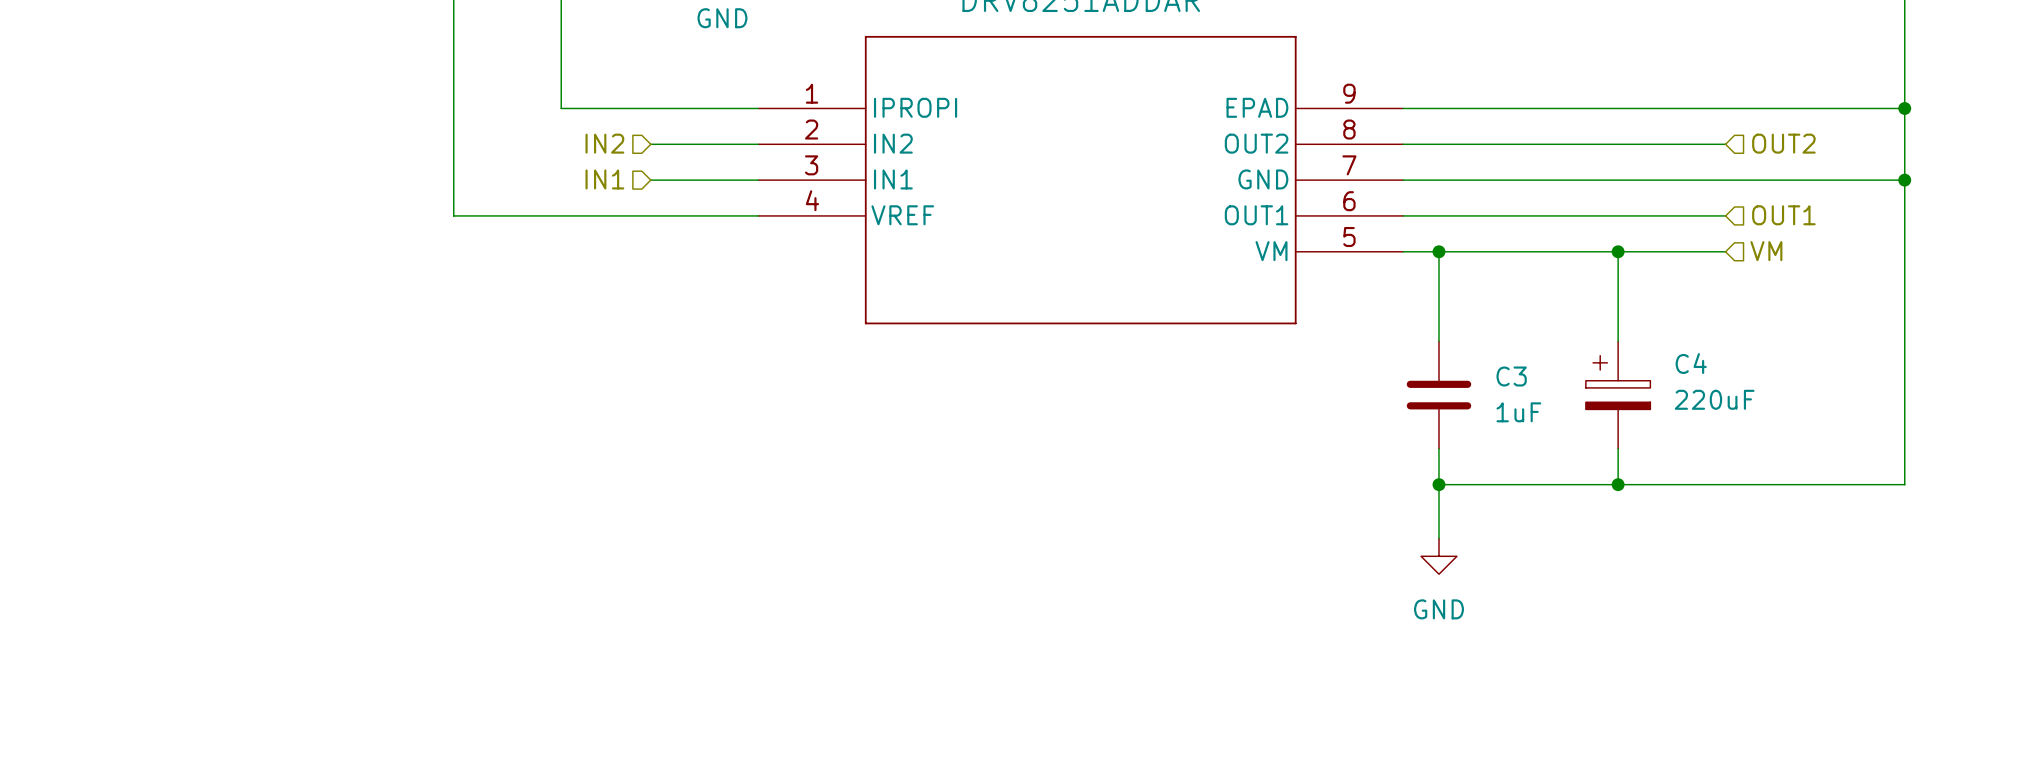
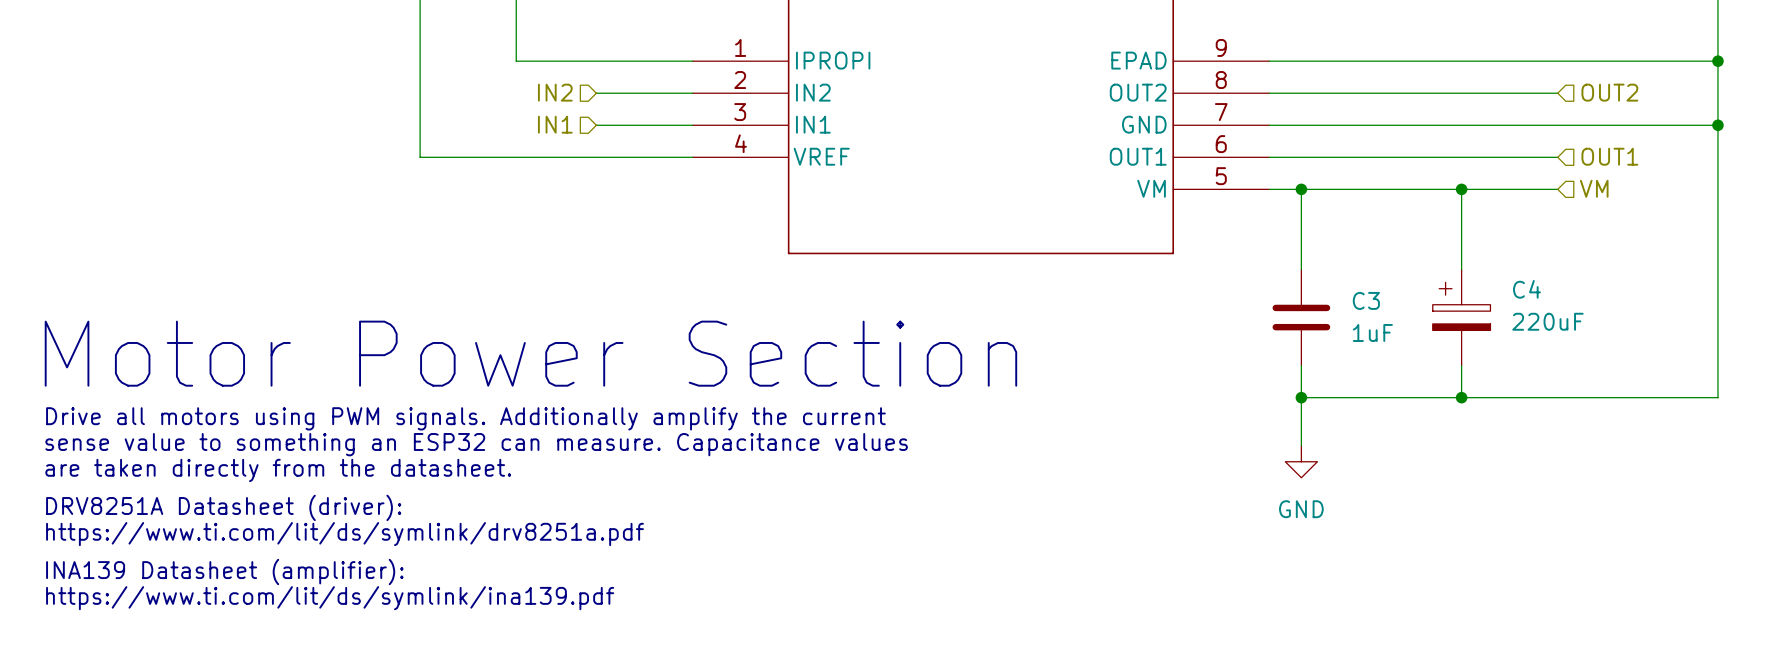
text: none -> Motor Power Section (530, 353)
text: none -> Drive all motors using PWM signals. Additionally amplify the current (465, 418)
text: none -> sense value to something an ESP32 can measure. Capacitance values (476, 444)
text: none -> are taken directly from the datasheet. (278, 470)
text: none -> DRV8251A Datasheet (driver): (223, 507)
text: none -> https://www.ti.com/lit/ds/symlink/drv8251a.pdf (345, 534)
text: none -> INA139 Datasheet (amplifier): (224, 571)
text: none -> https://www.ti.com/lit/ds/symlink/ina139.pdf (330, 598)

